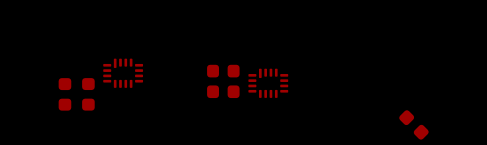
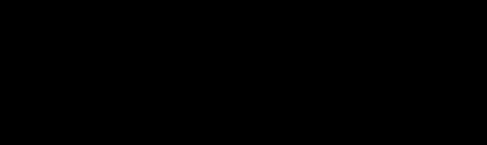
part: (223, 71) -> none
part: (123, 73) -> none
part: (268, 83) -> none
part: (223, 91) -> none
part: (64, 94) -> none
part: (88, 94) -> none
part: (413, 124) -> none

